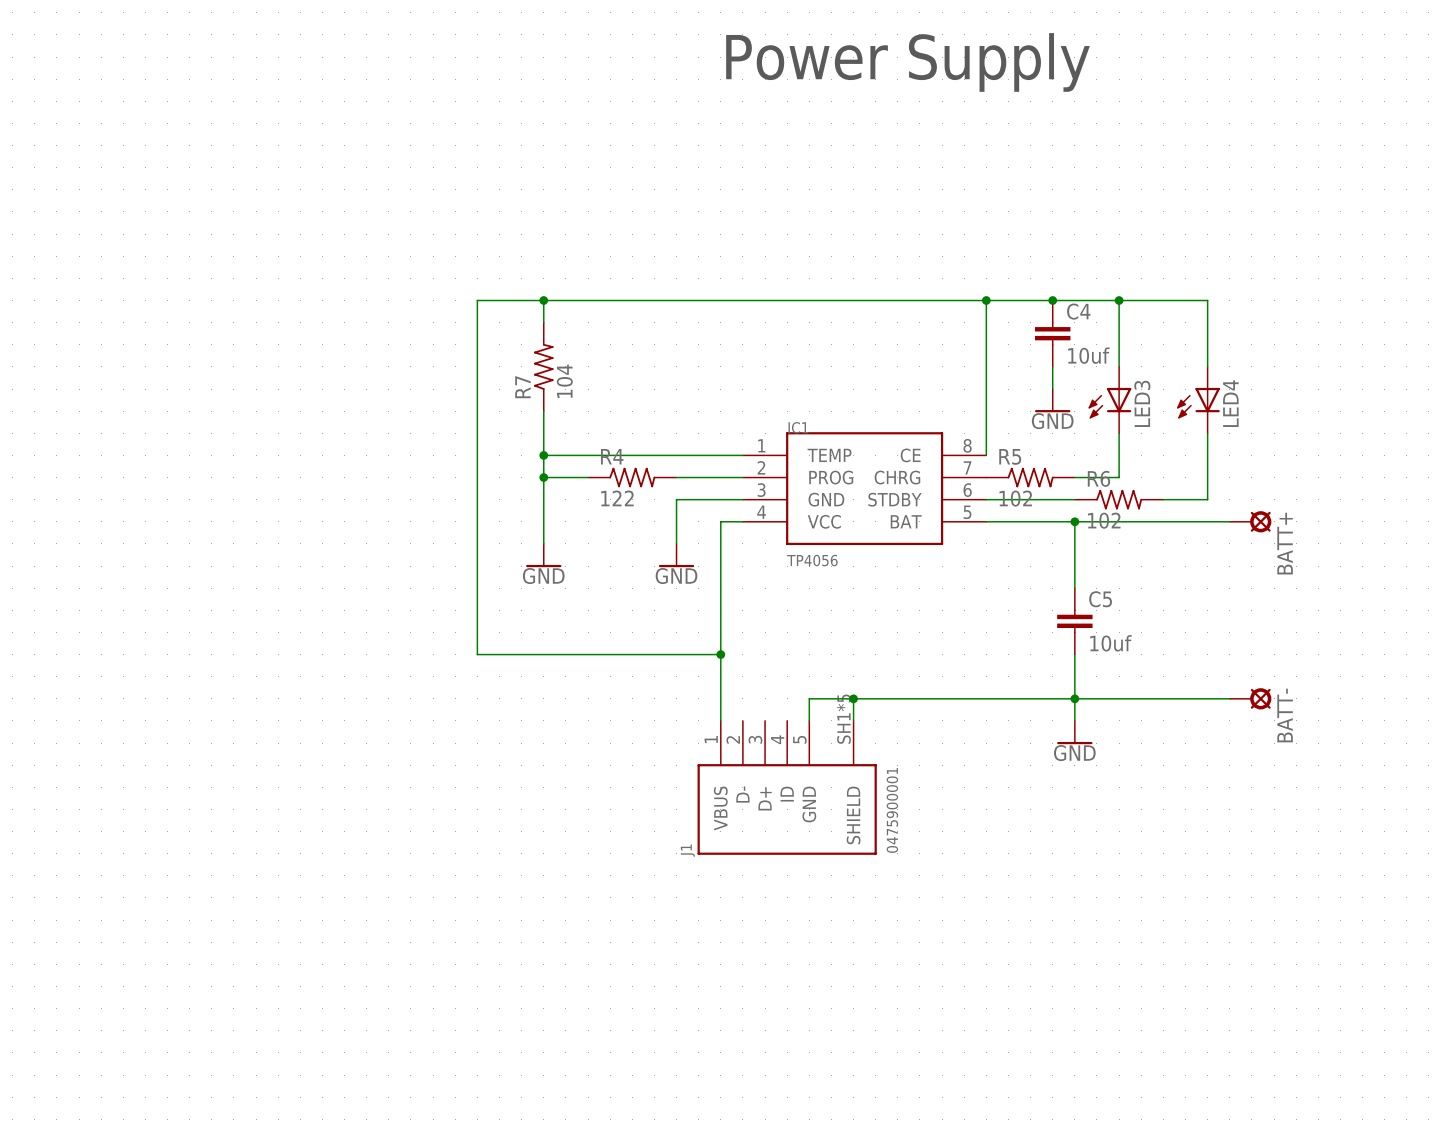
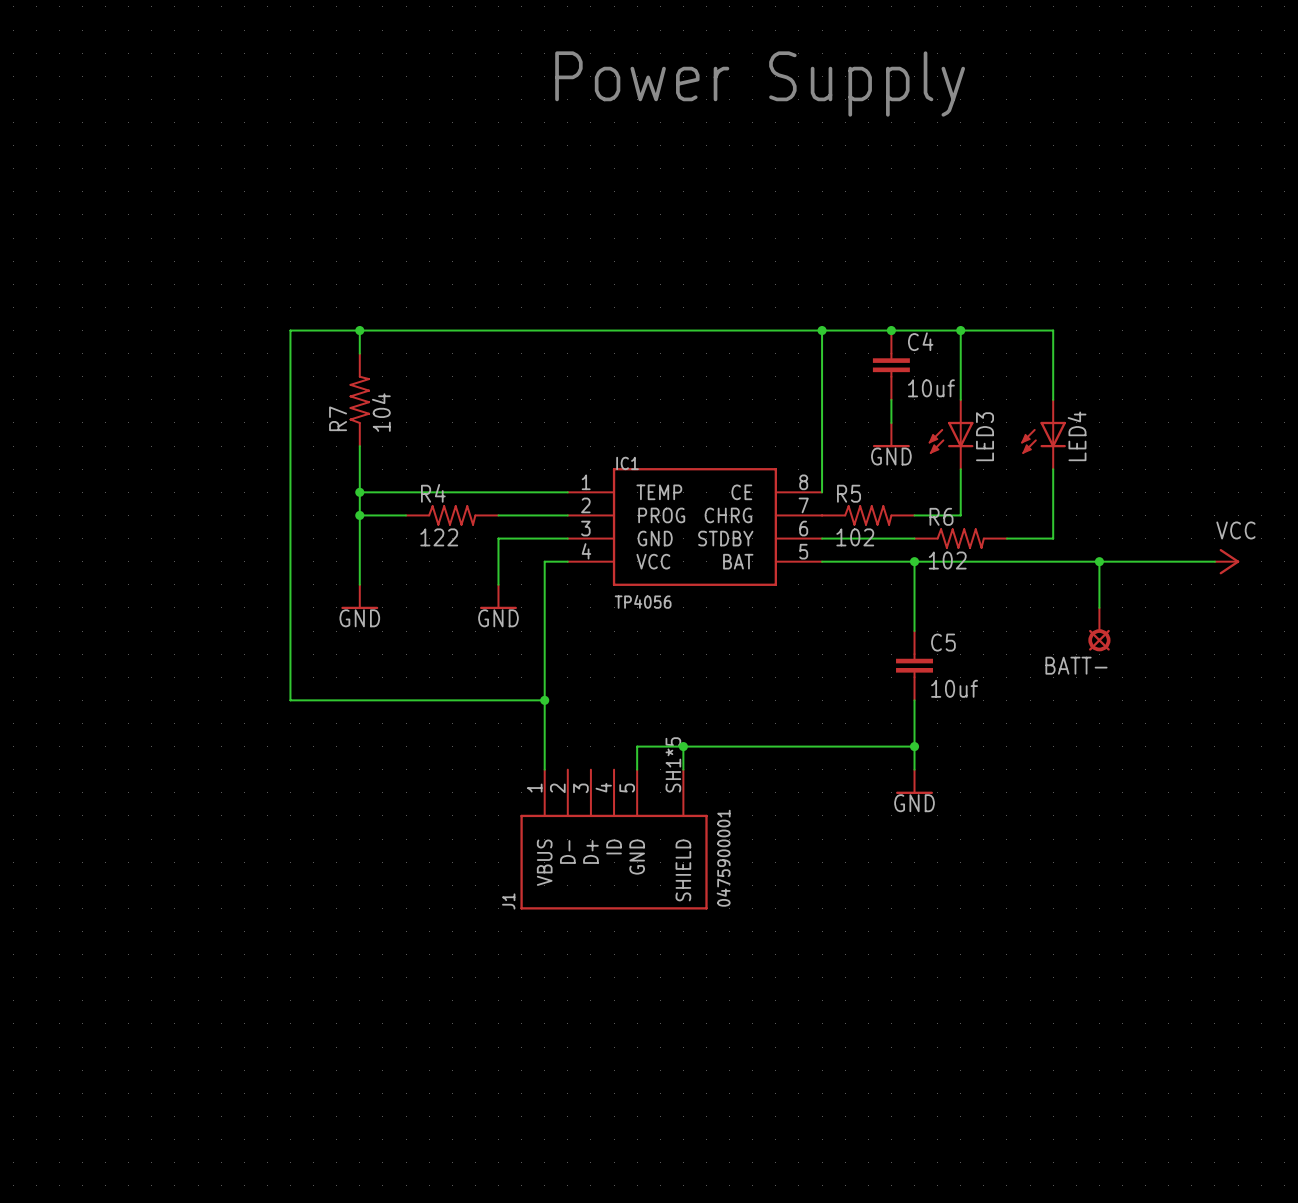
wire: none -> (1076, 561) (1214, 561)
BATT+: (1250, 521) -> none
wire: none -> (1099, 561) (1099, 607)
junction: none -> (1099, 561)
power symbol: none -> VCC (1227, 561)
wire: (1074, 698) (1229, 698) -> none
BATT- position: (1250, 698) -> (1099, 629)
BATT- rotation: 0° (1260, 698) -> 90° clockwise (1099, 640)

